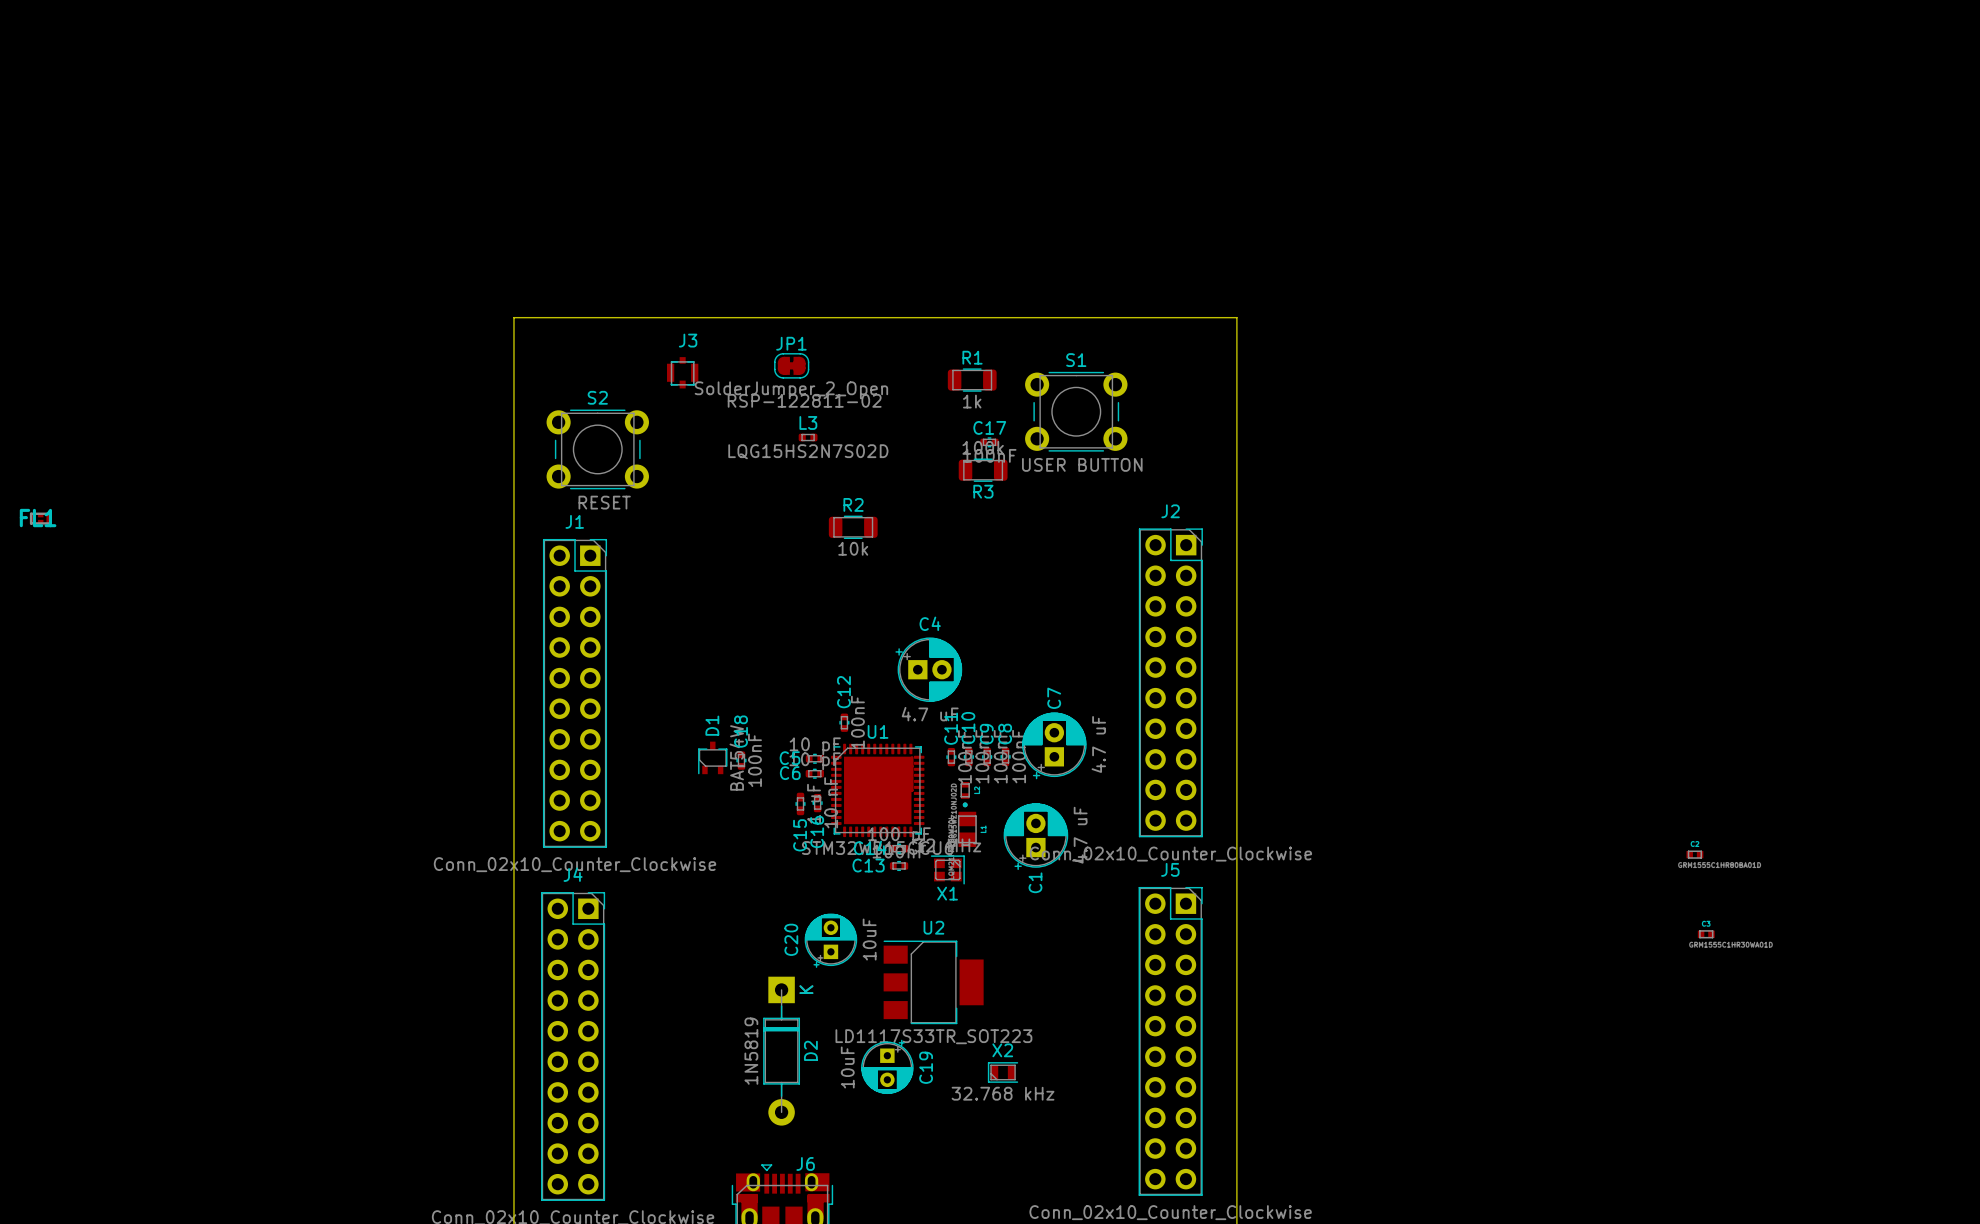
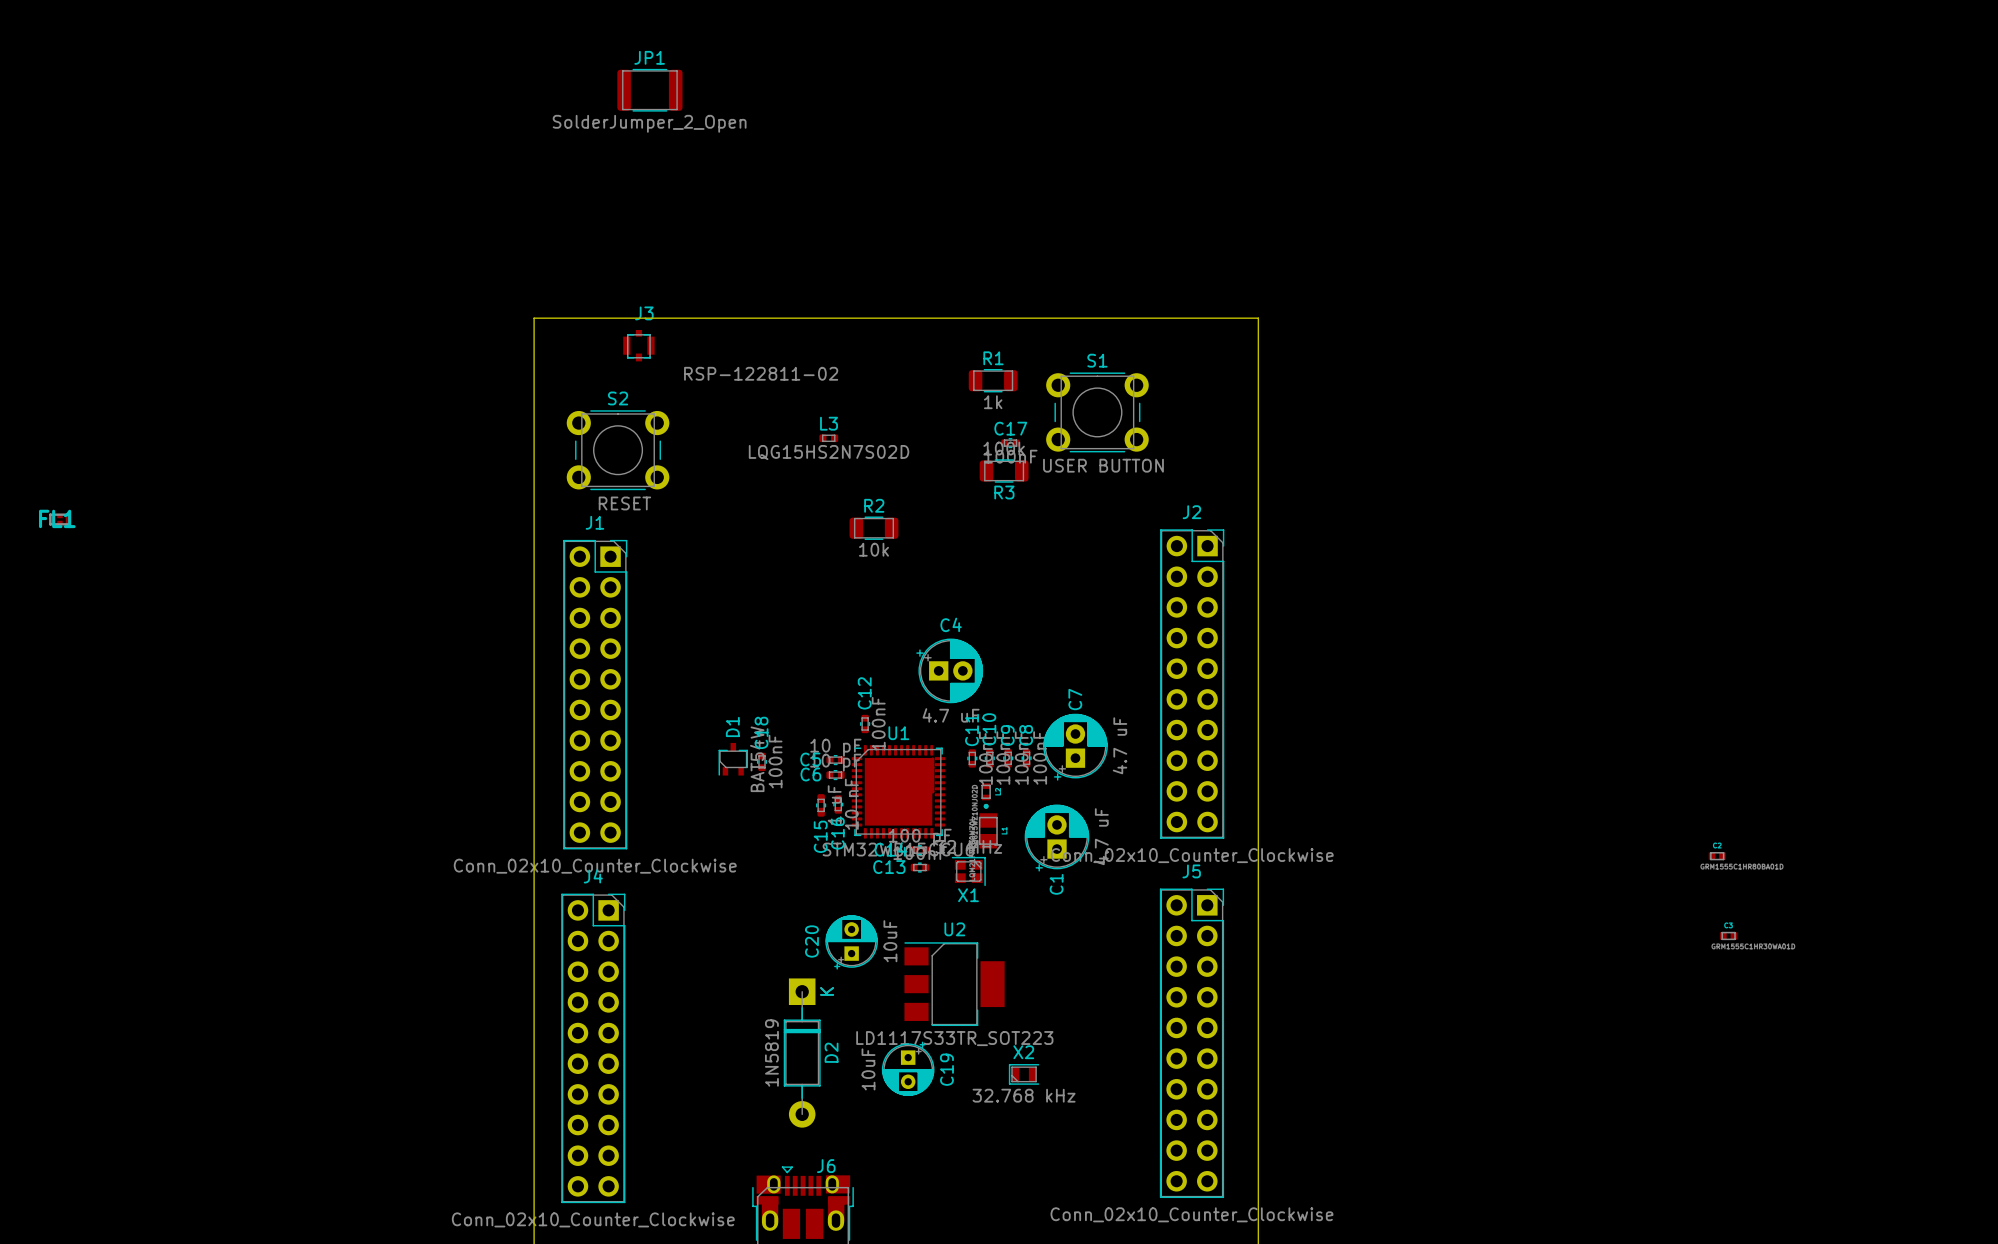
JP1 footprint: [774, 353, 810, 379] -> [617, 68, 683, 112]
J3 position: (682, 372) -> (638, 345)

